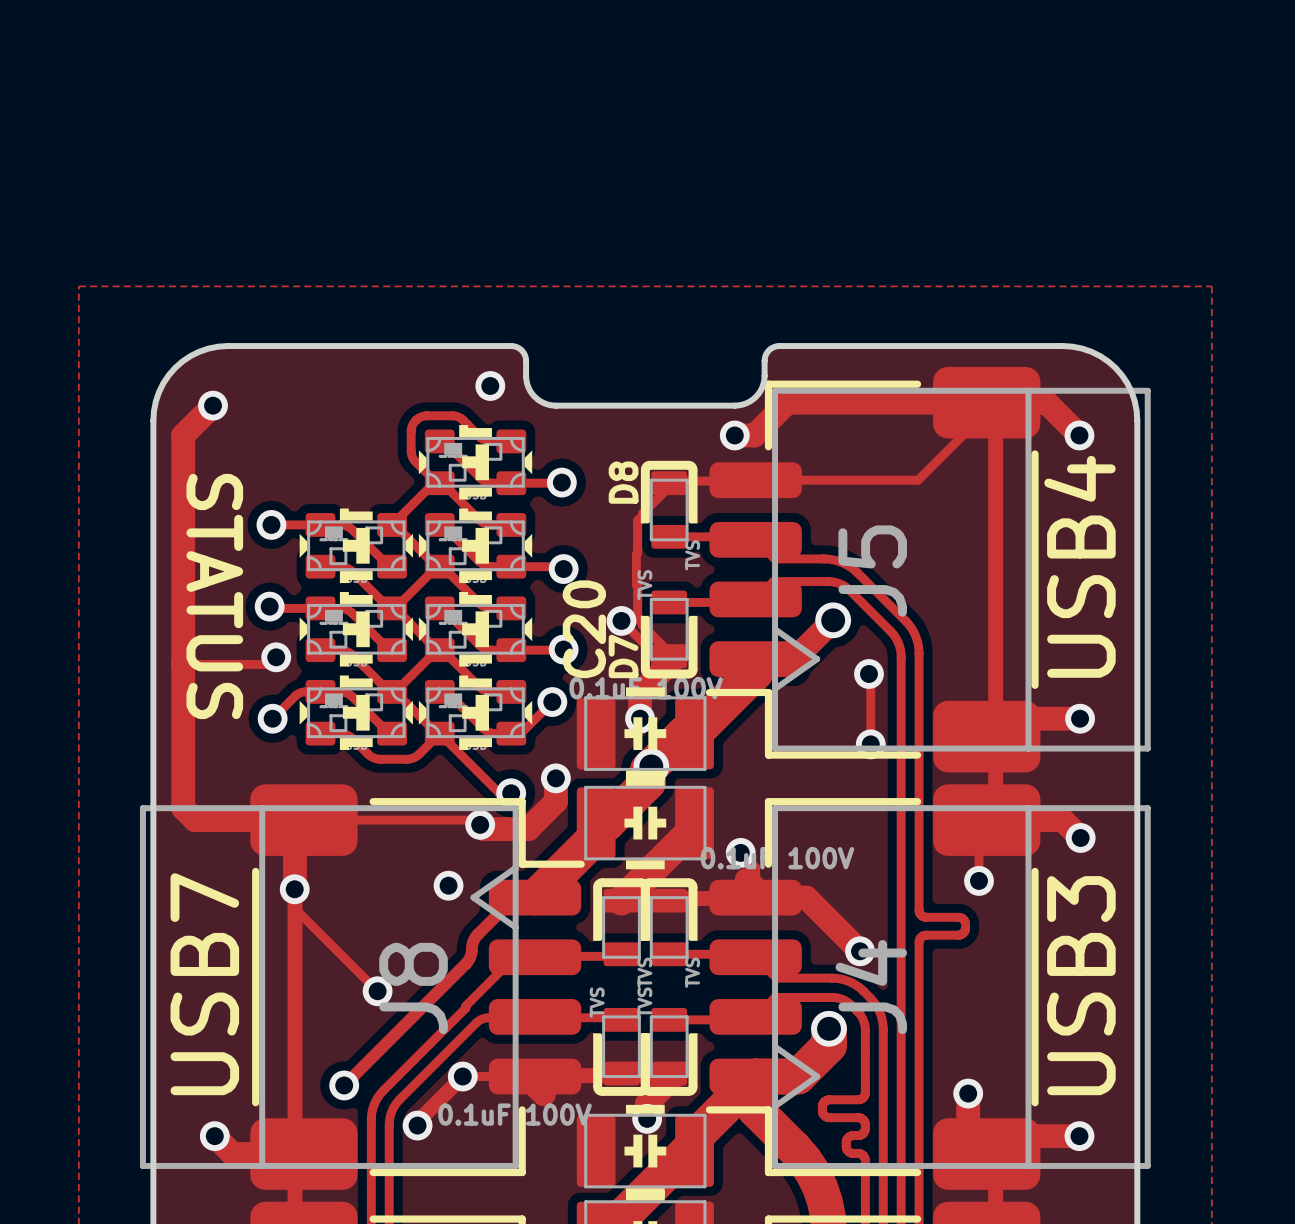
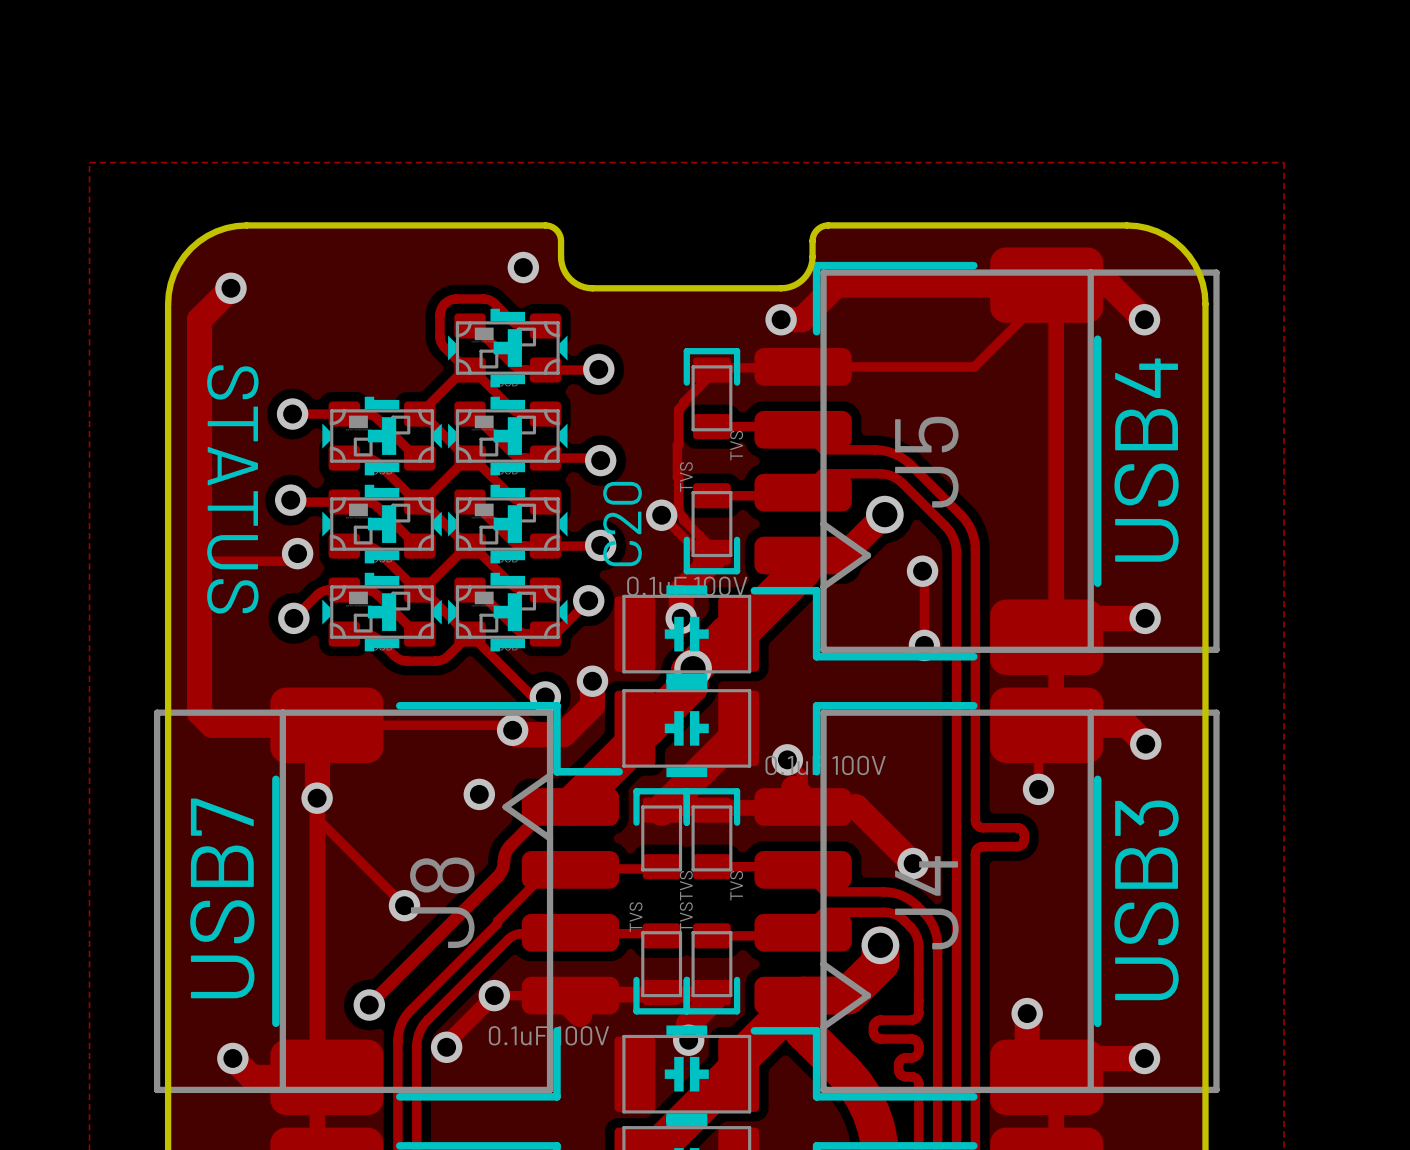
D8: TVS (669, 504) -> none
part: none -> TVS (711, 393)
part: none -> TVS (711, 528)
D7: TVS (669, 634) -> none
part footprint: [593, 878, 650, 967] -> [633, 788, 690, 880]
part footprint: [640, 878, 698, 967] -> [683, 788, 741, 880]
part footprint: [593, 1007, 650, 1096] -> [633, 923, 690, 1015]
part footprint: [640, 1007, 698, 1096] -> [683, 923, 741, 1015]

